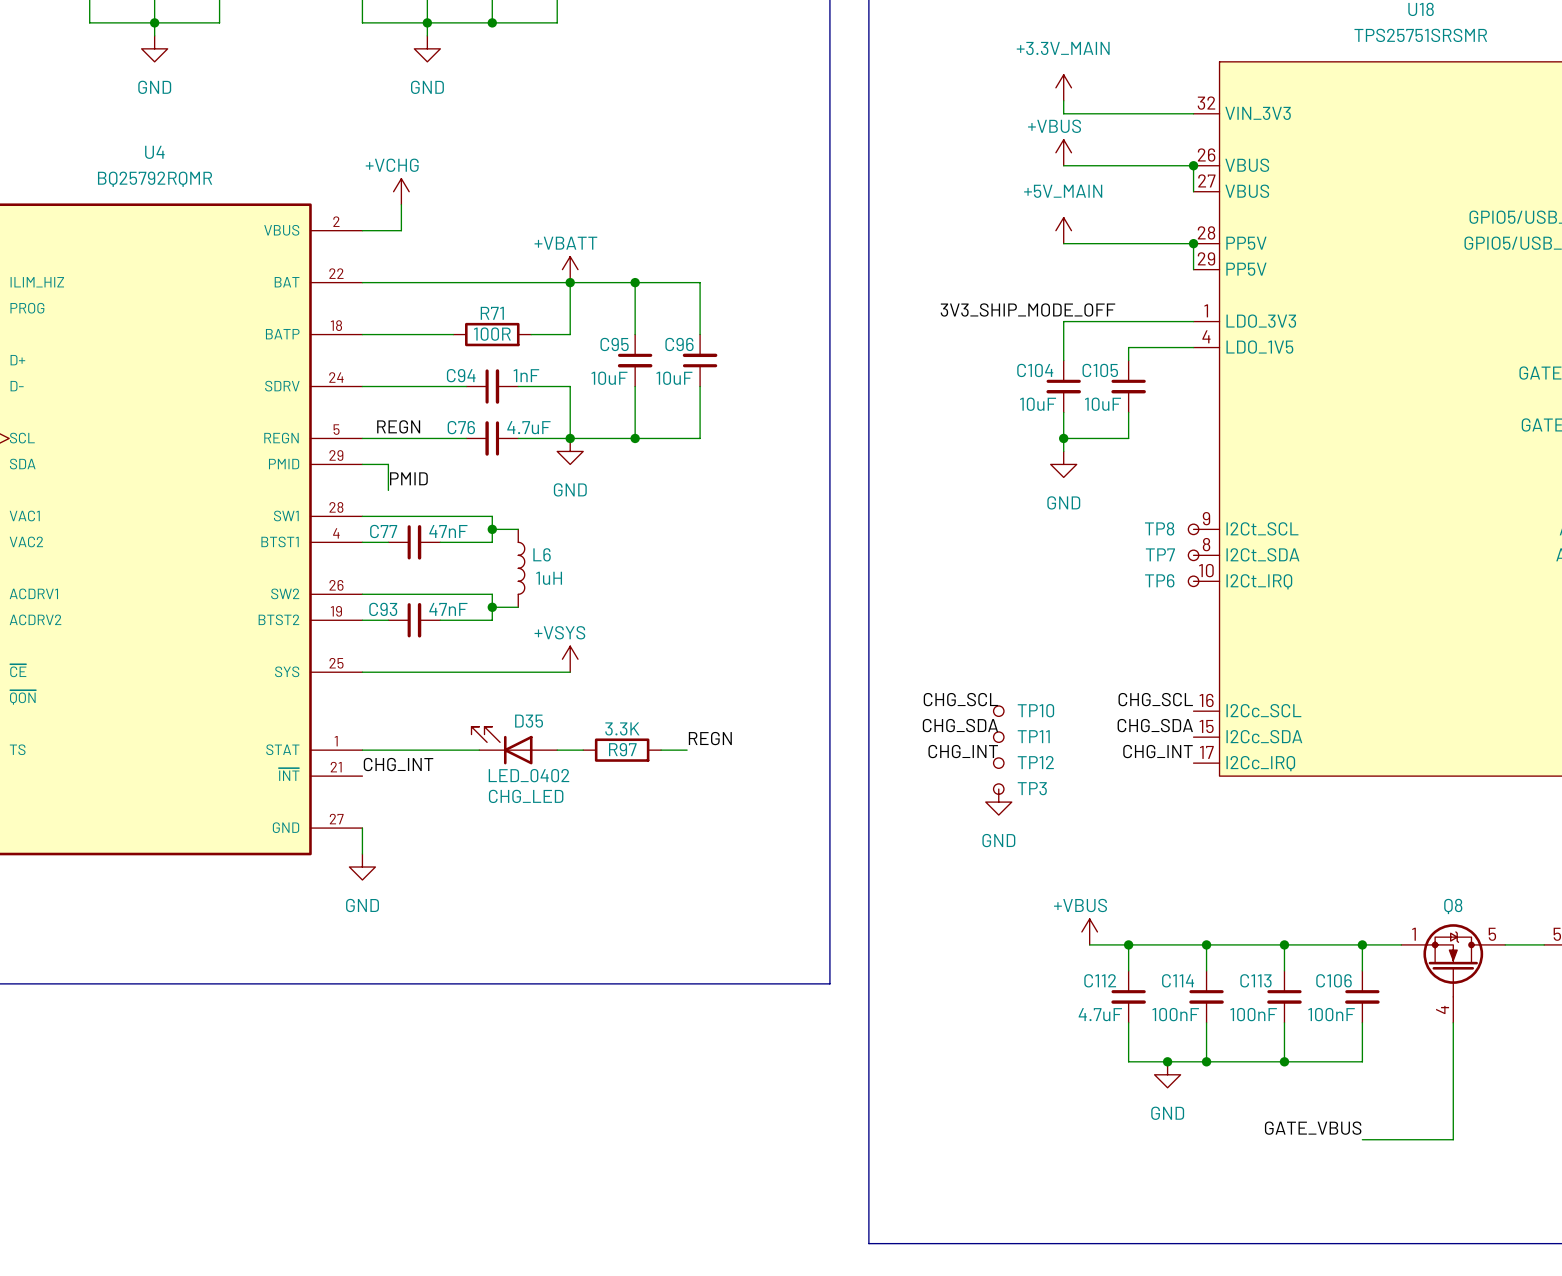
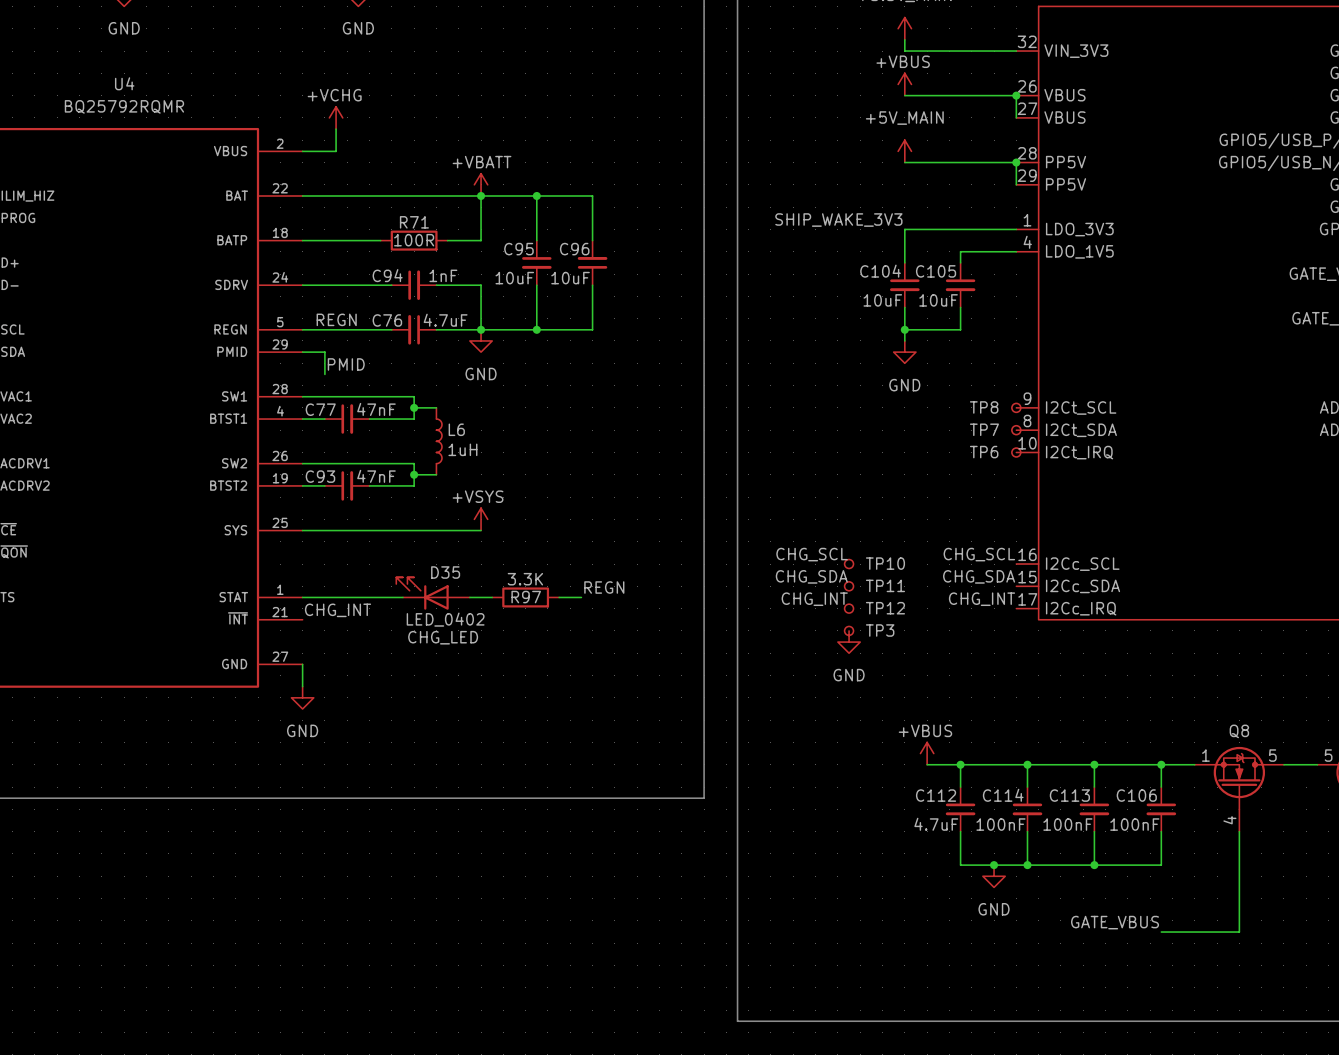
label: none -> SHIP_WAKE_3V3 (838, 220)
label: 3V3_SHIP_MODE_OFF (1027, 309) -> none

